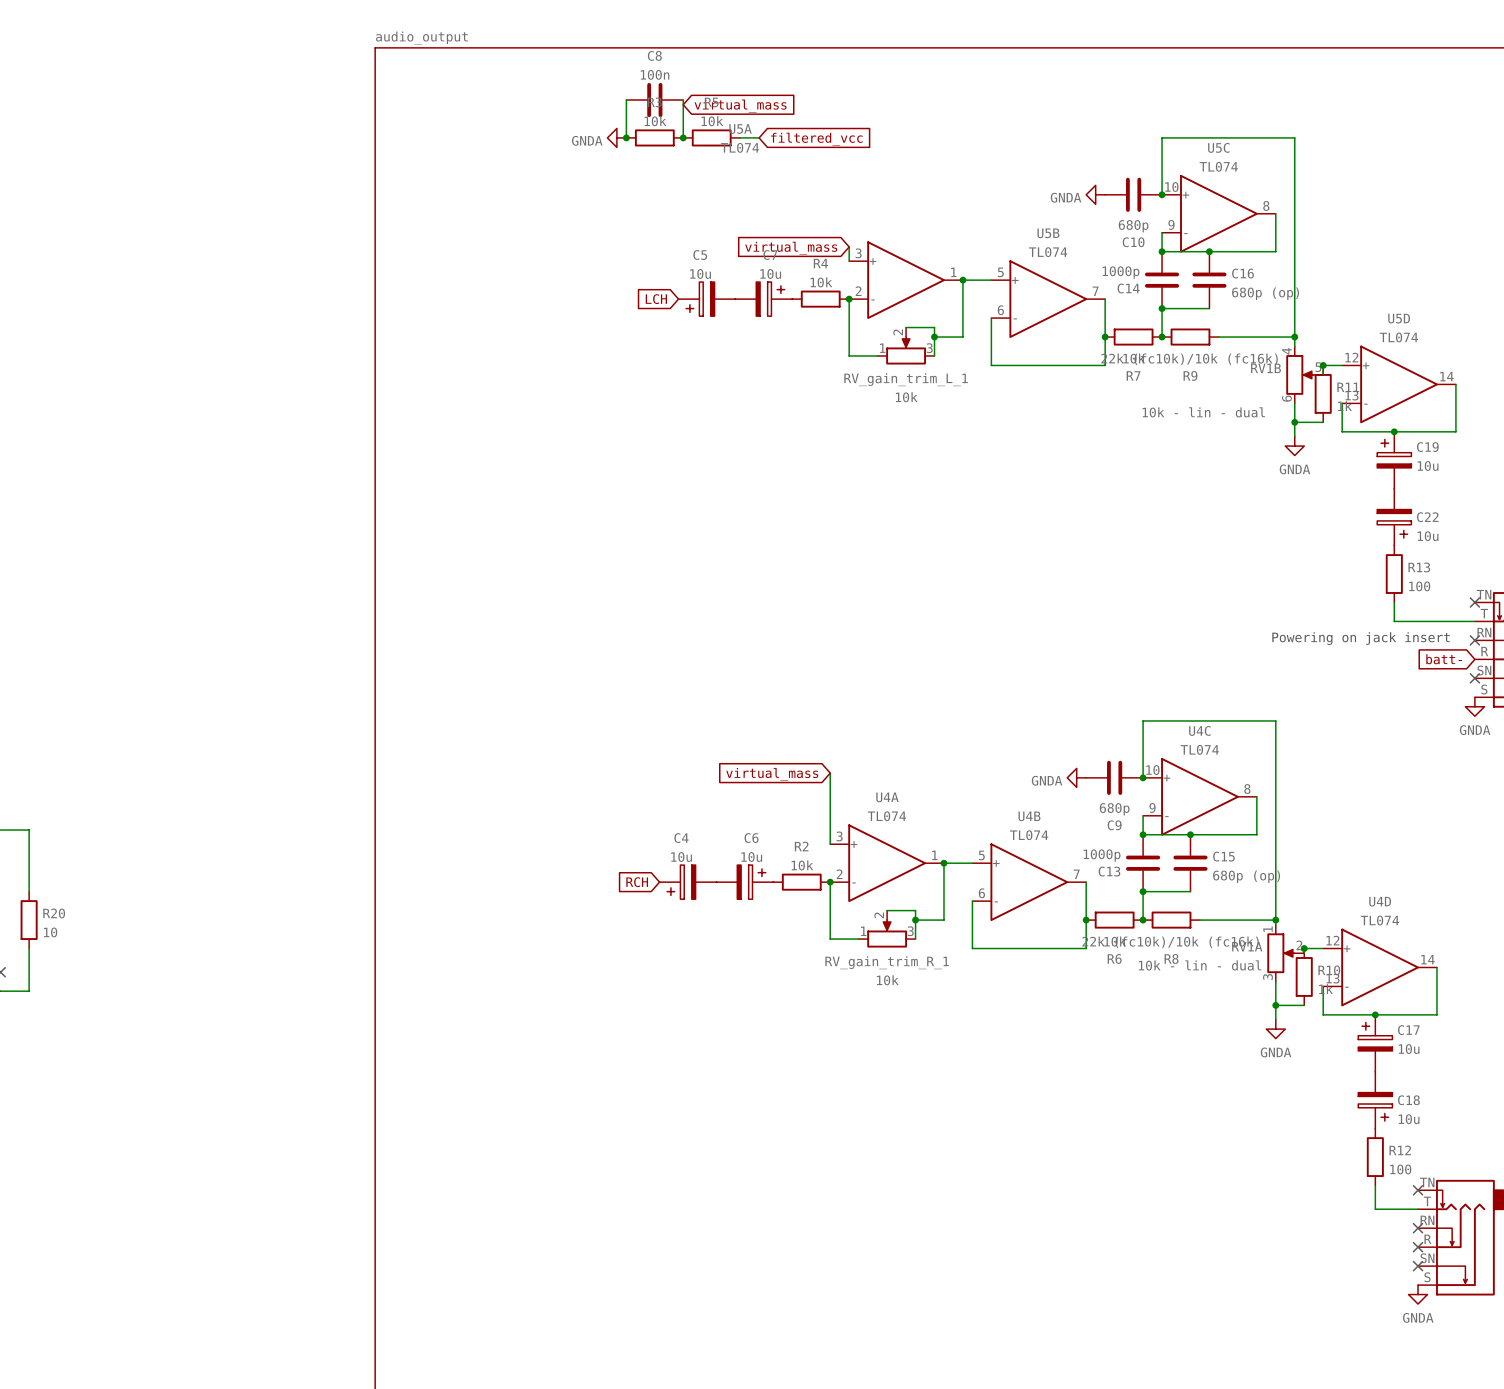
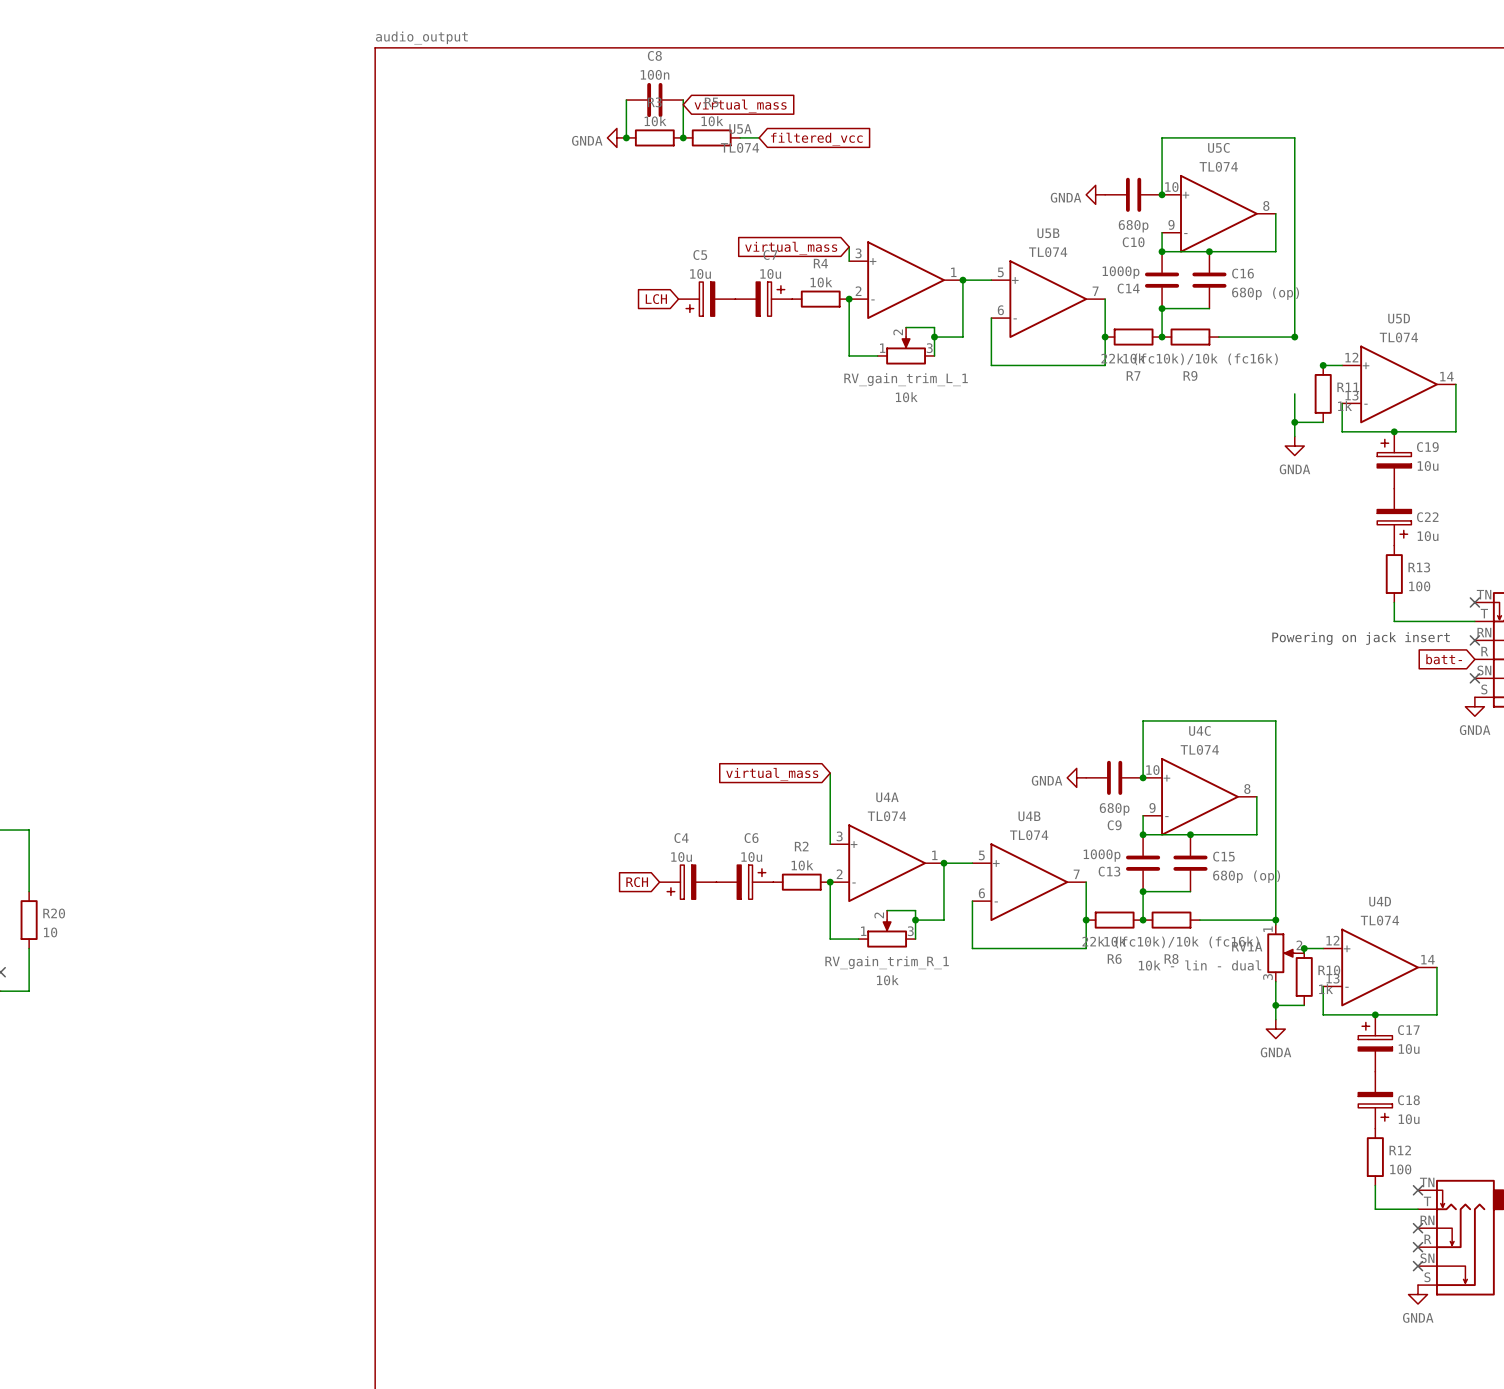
wire: (1294, 337) (1294, 346) -> none
RV1B: 10k - lin - dual (1304, 374) -> none

